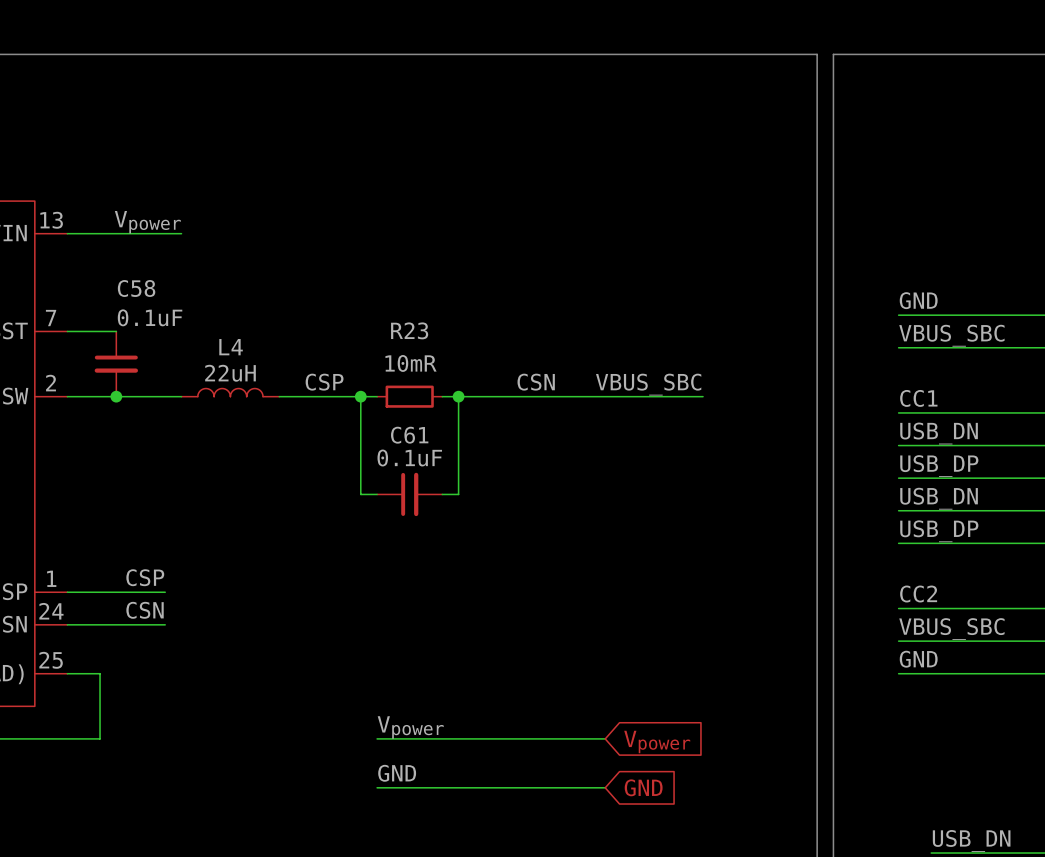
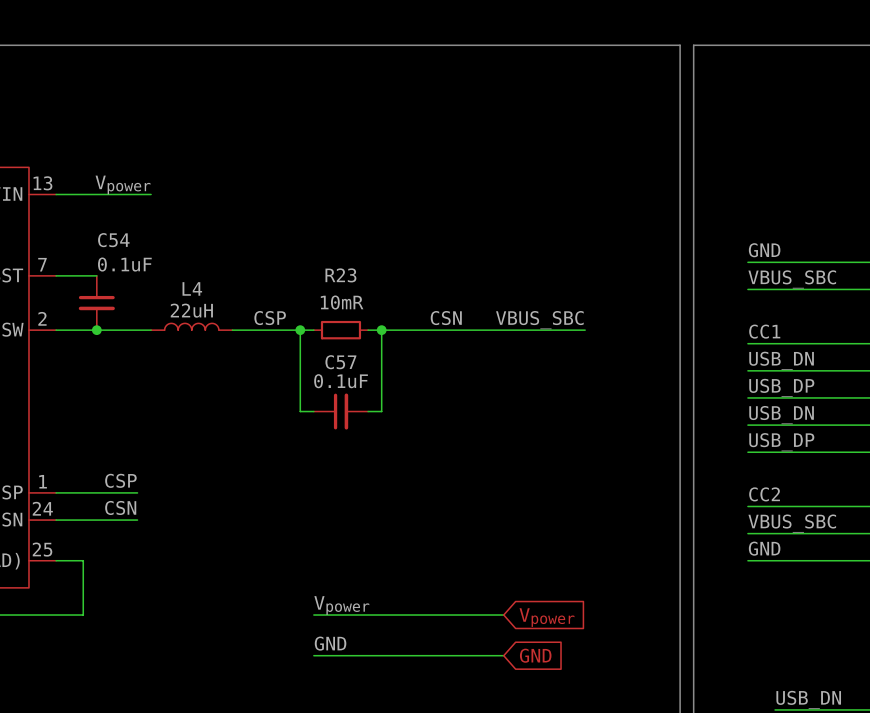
C58 name: C58 (136, 288) -> C54 (113, 240)
C61 name: C61 (409, 435) -> C57 (340, 362)

